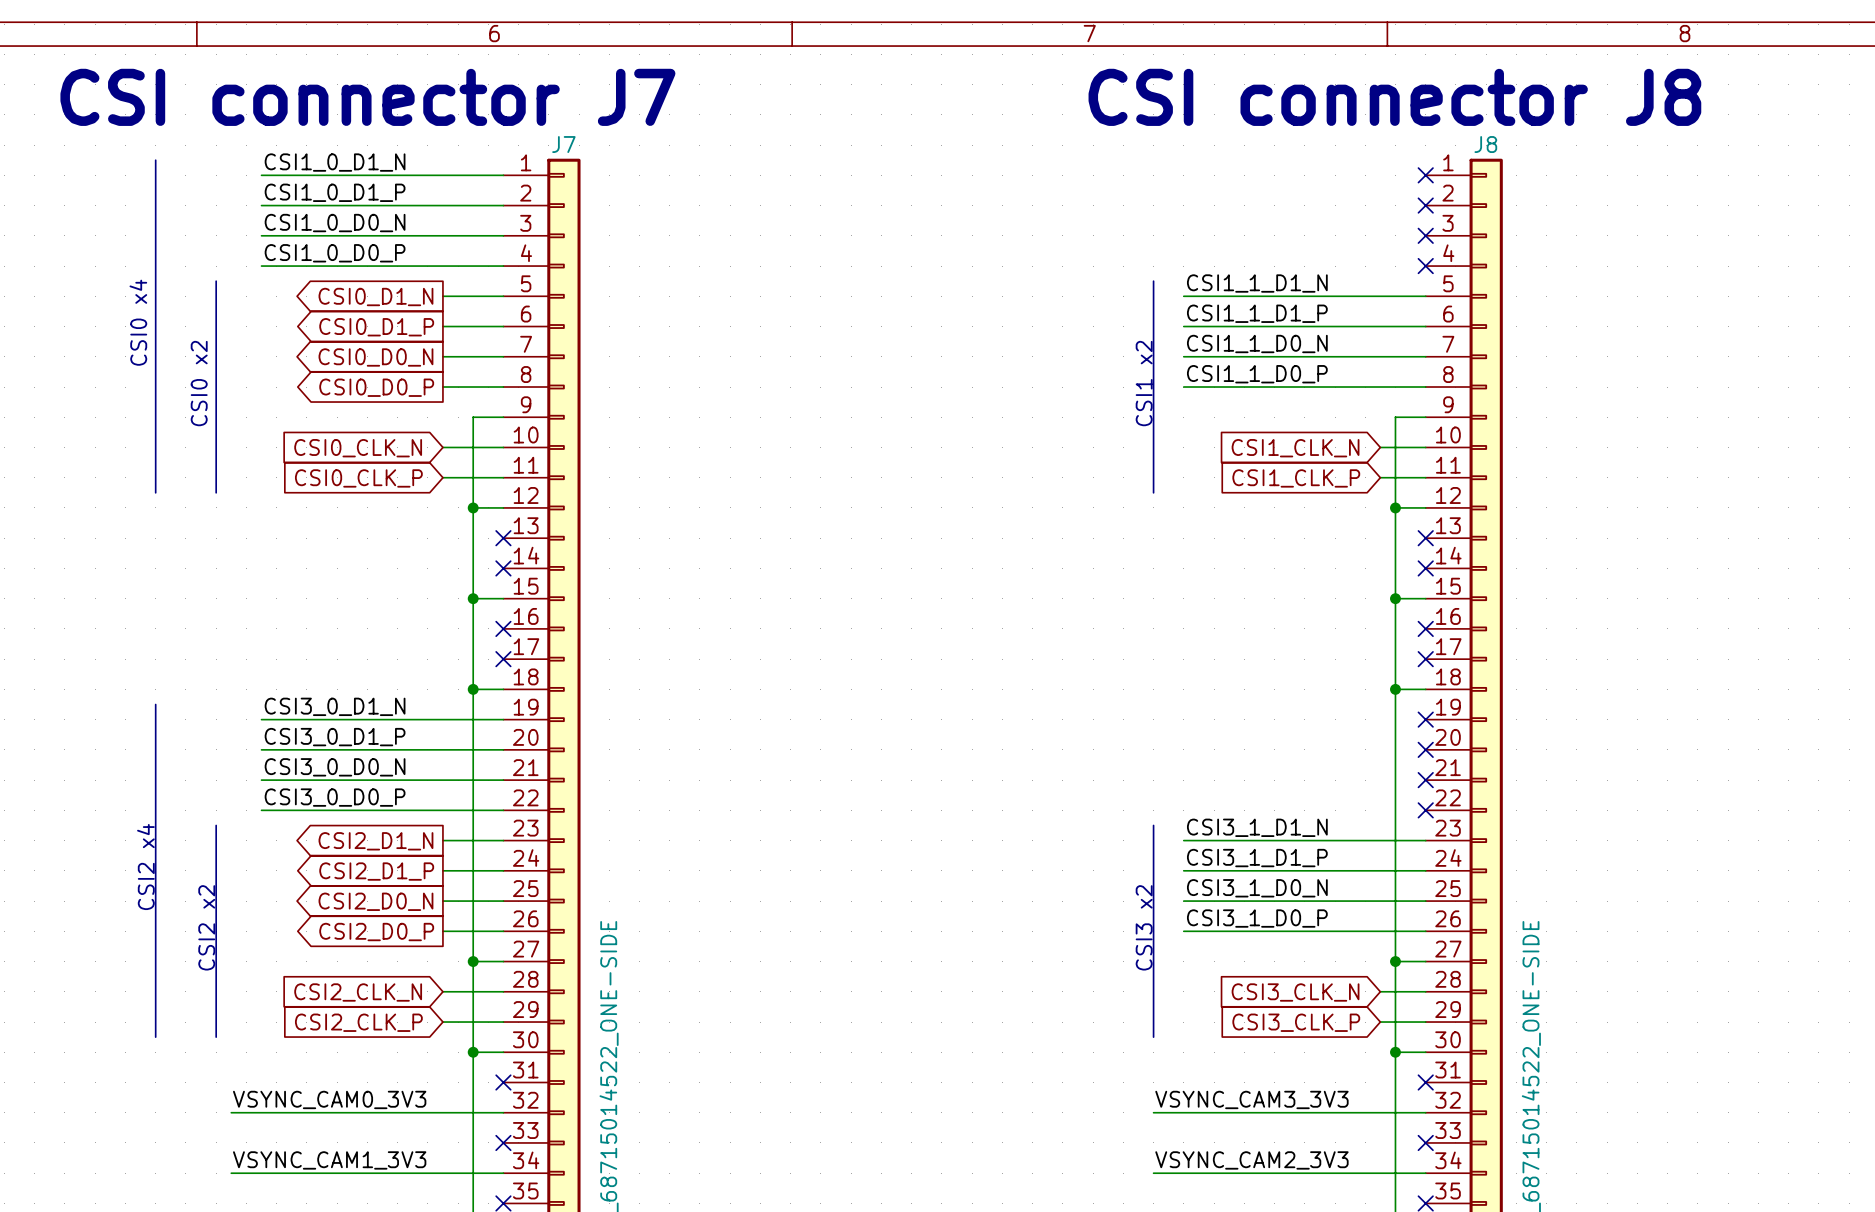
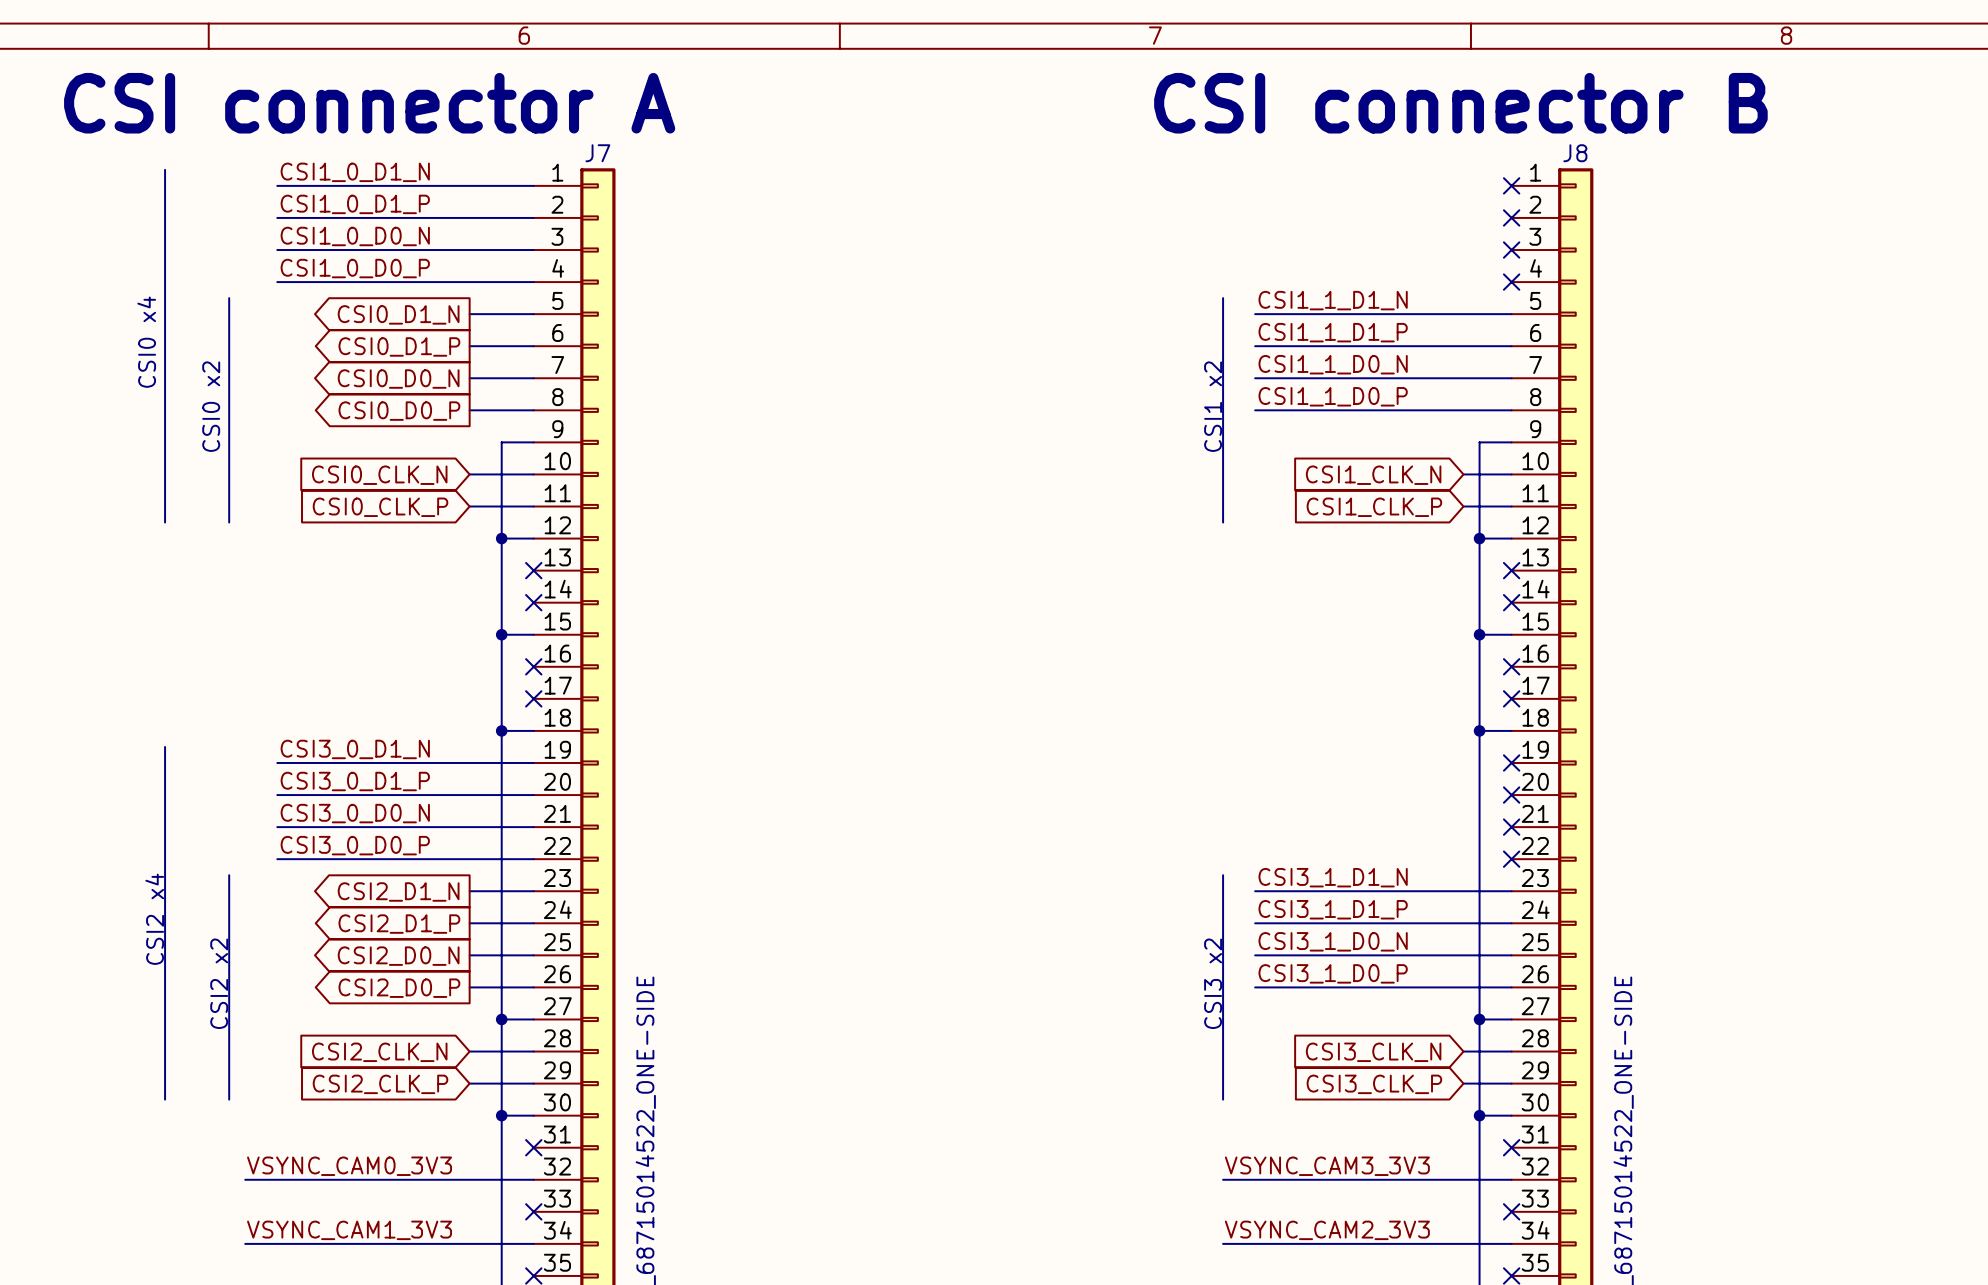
text: CSI connector J7 (367, 97) -> CSI connector A (369, 103)
text: CSI connector J8 (1394, 97) -> CSI connector B (1460, 103)

